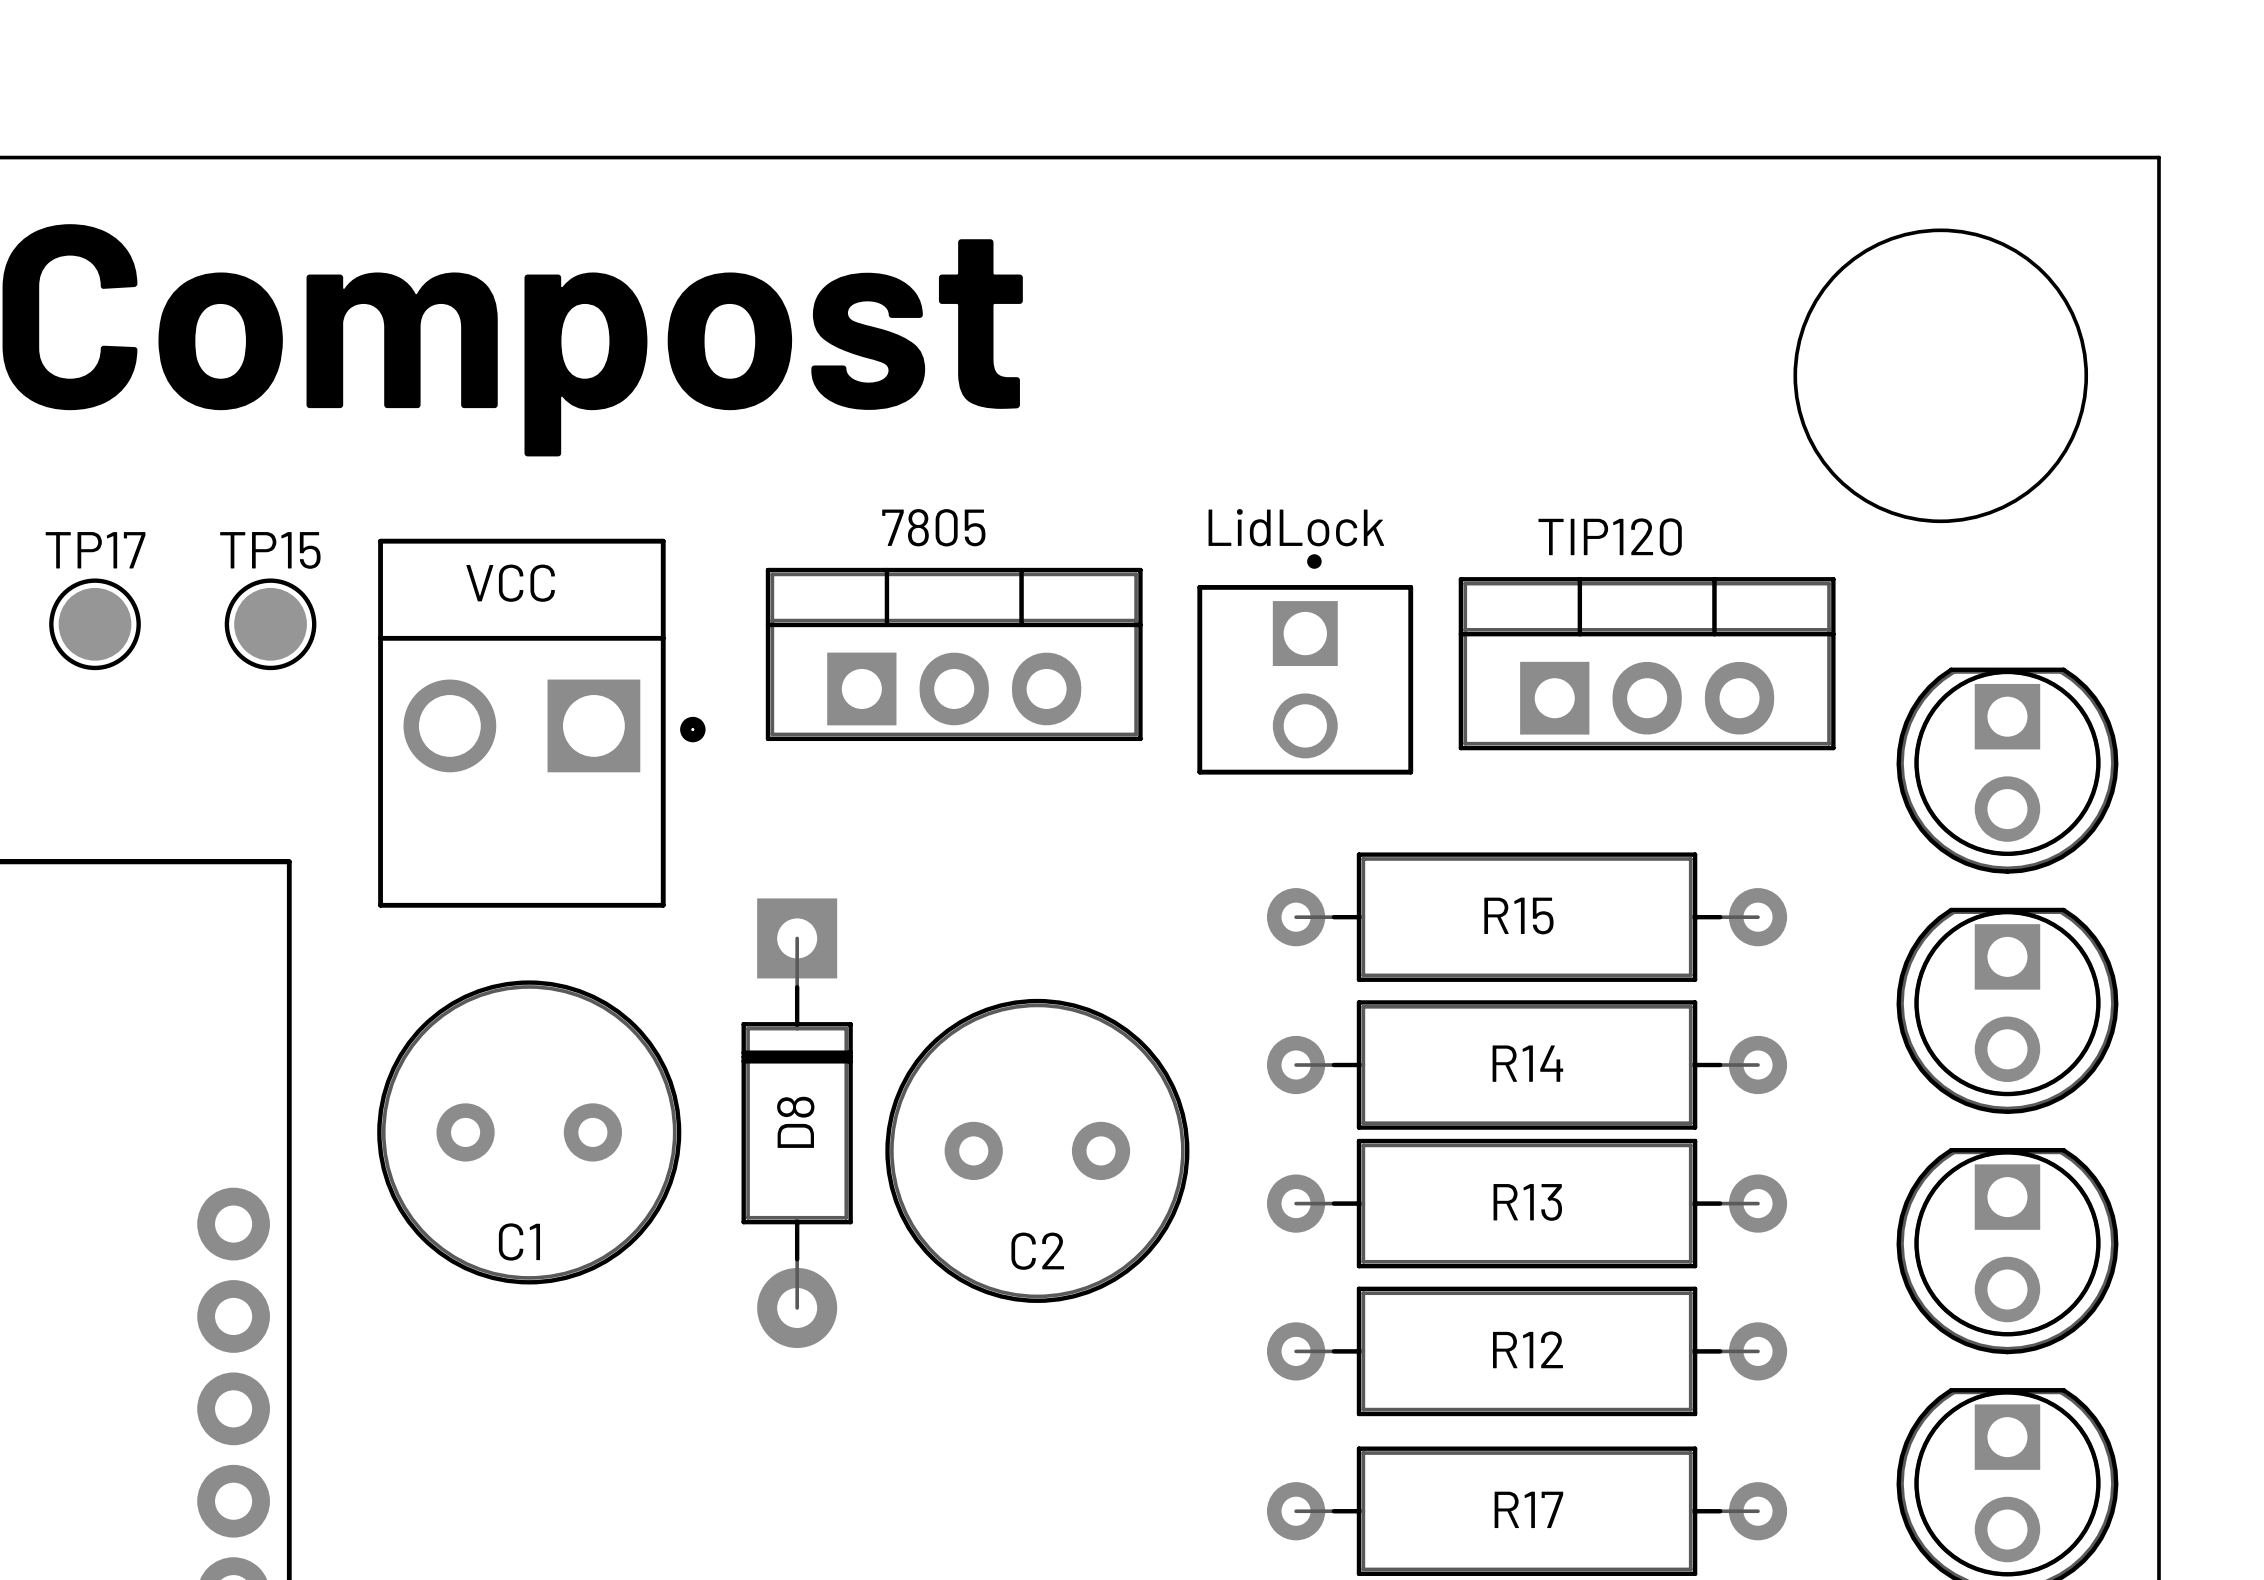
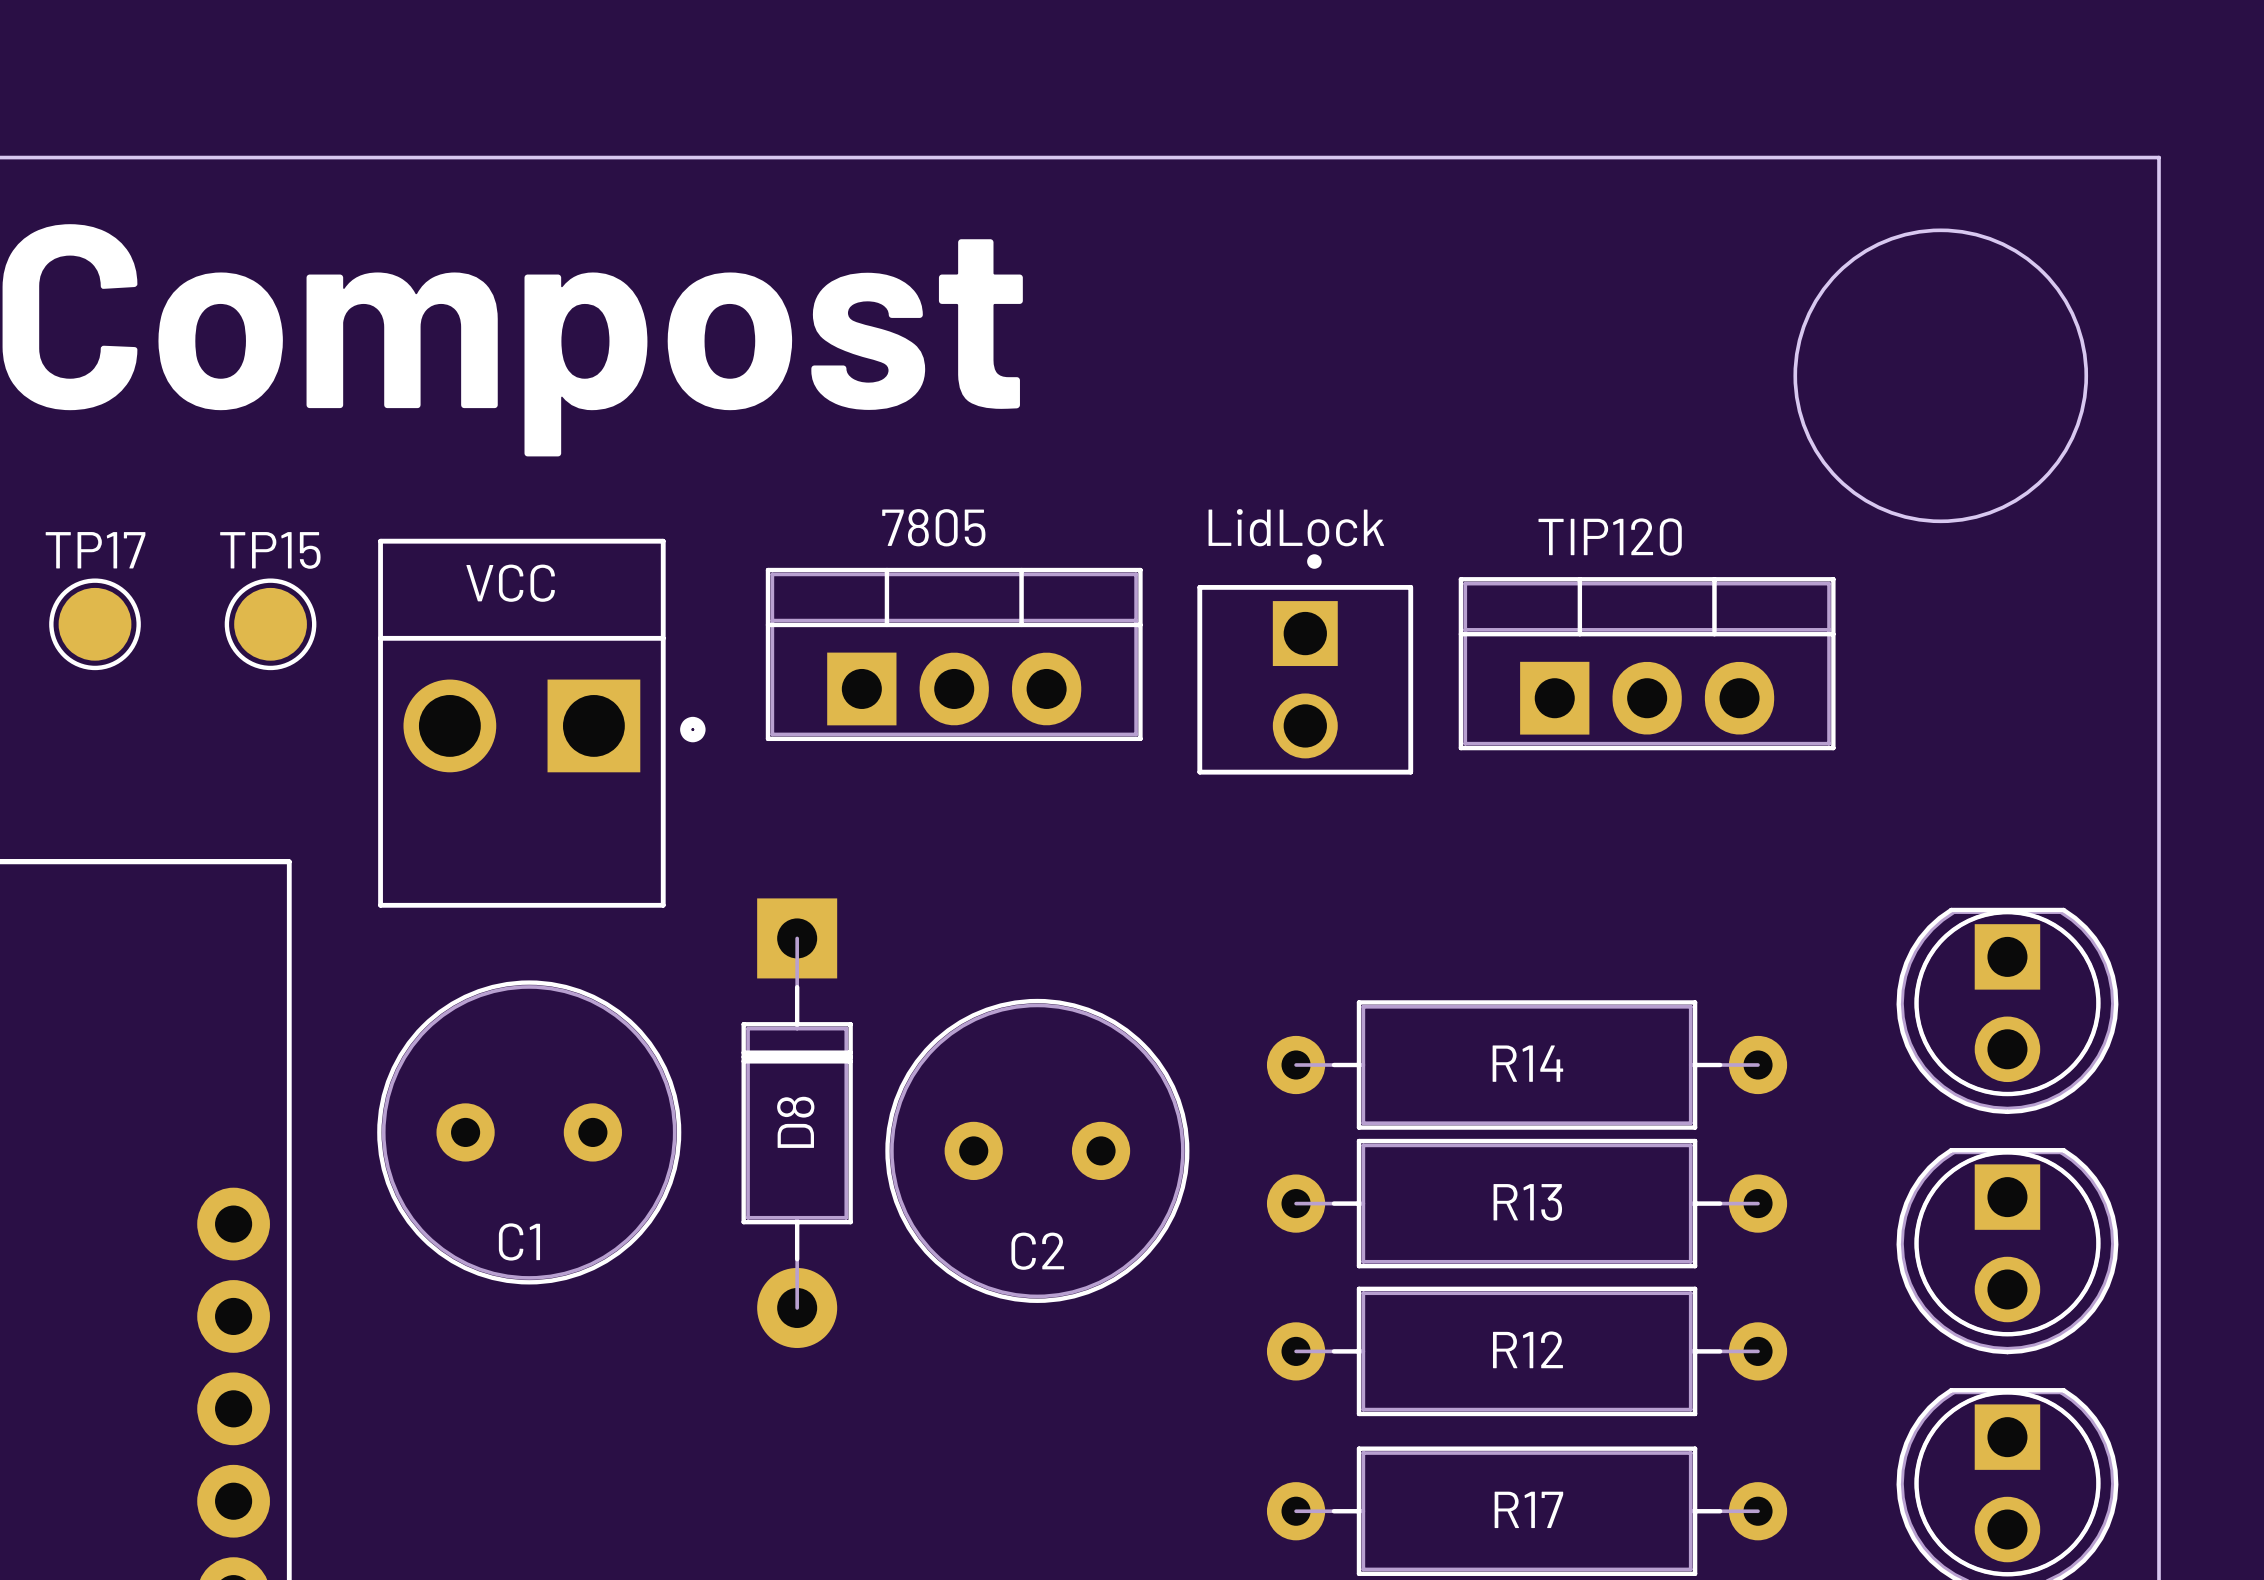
part: (2007, 770) -> none
R15: (1527, 917) -> none

